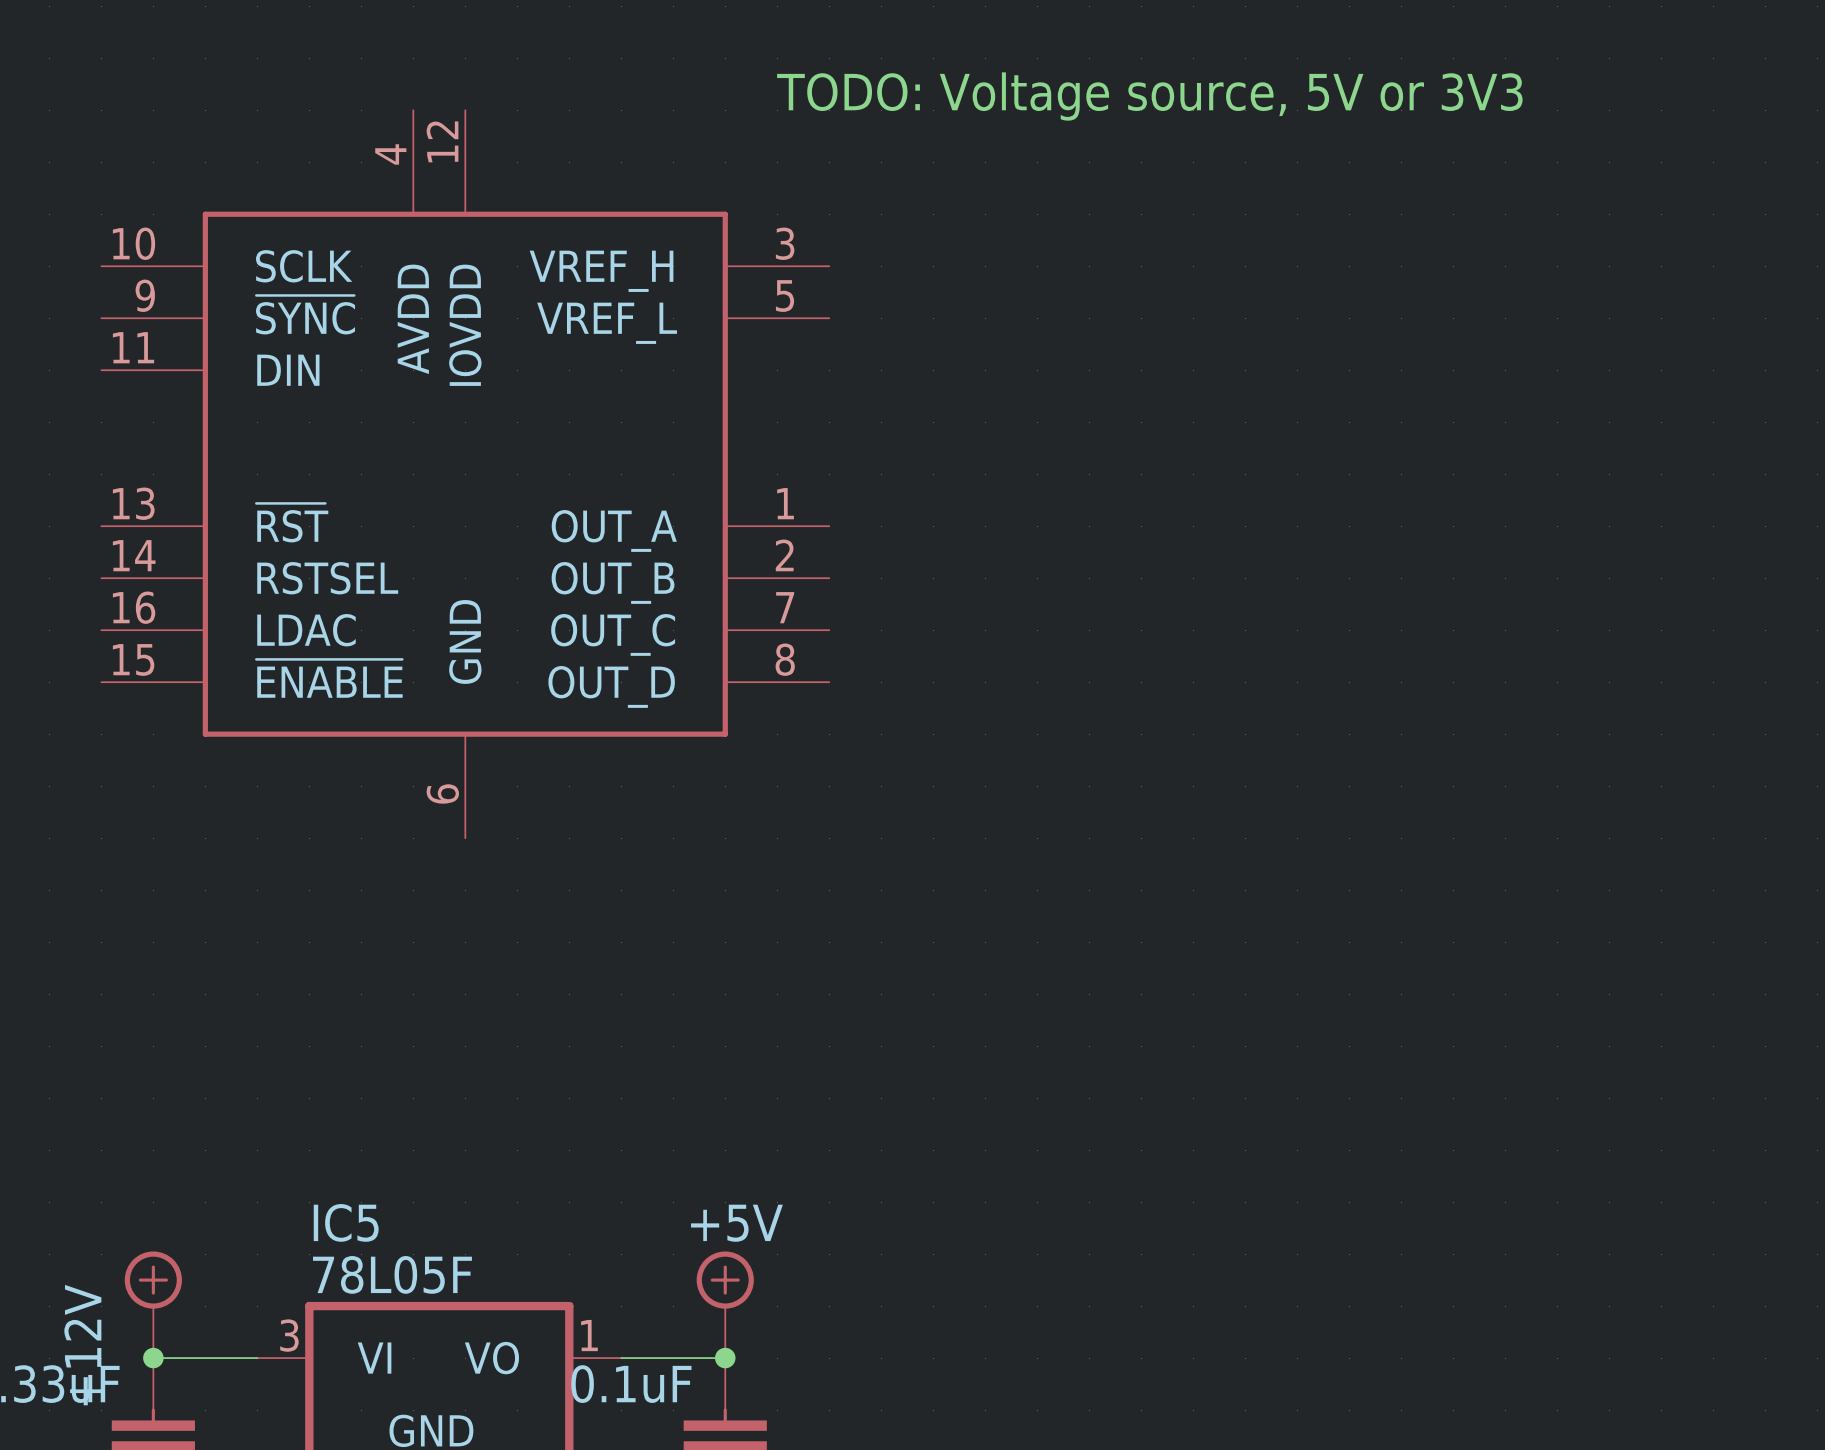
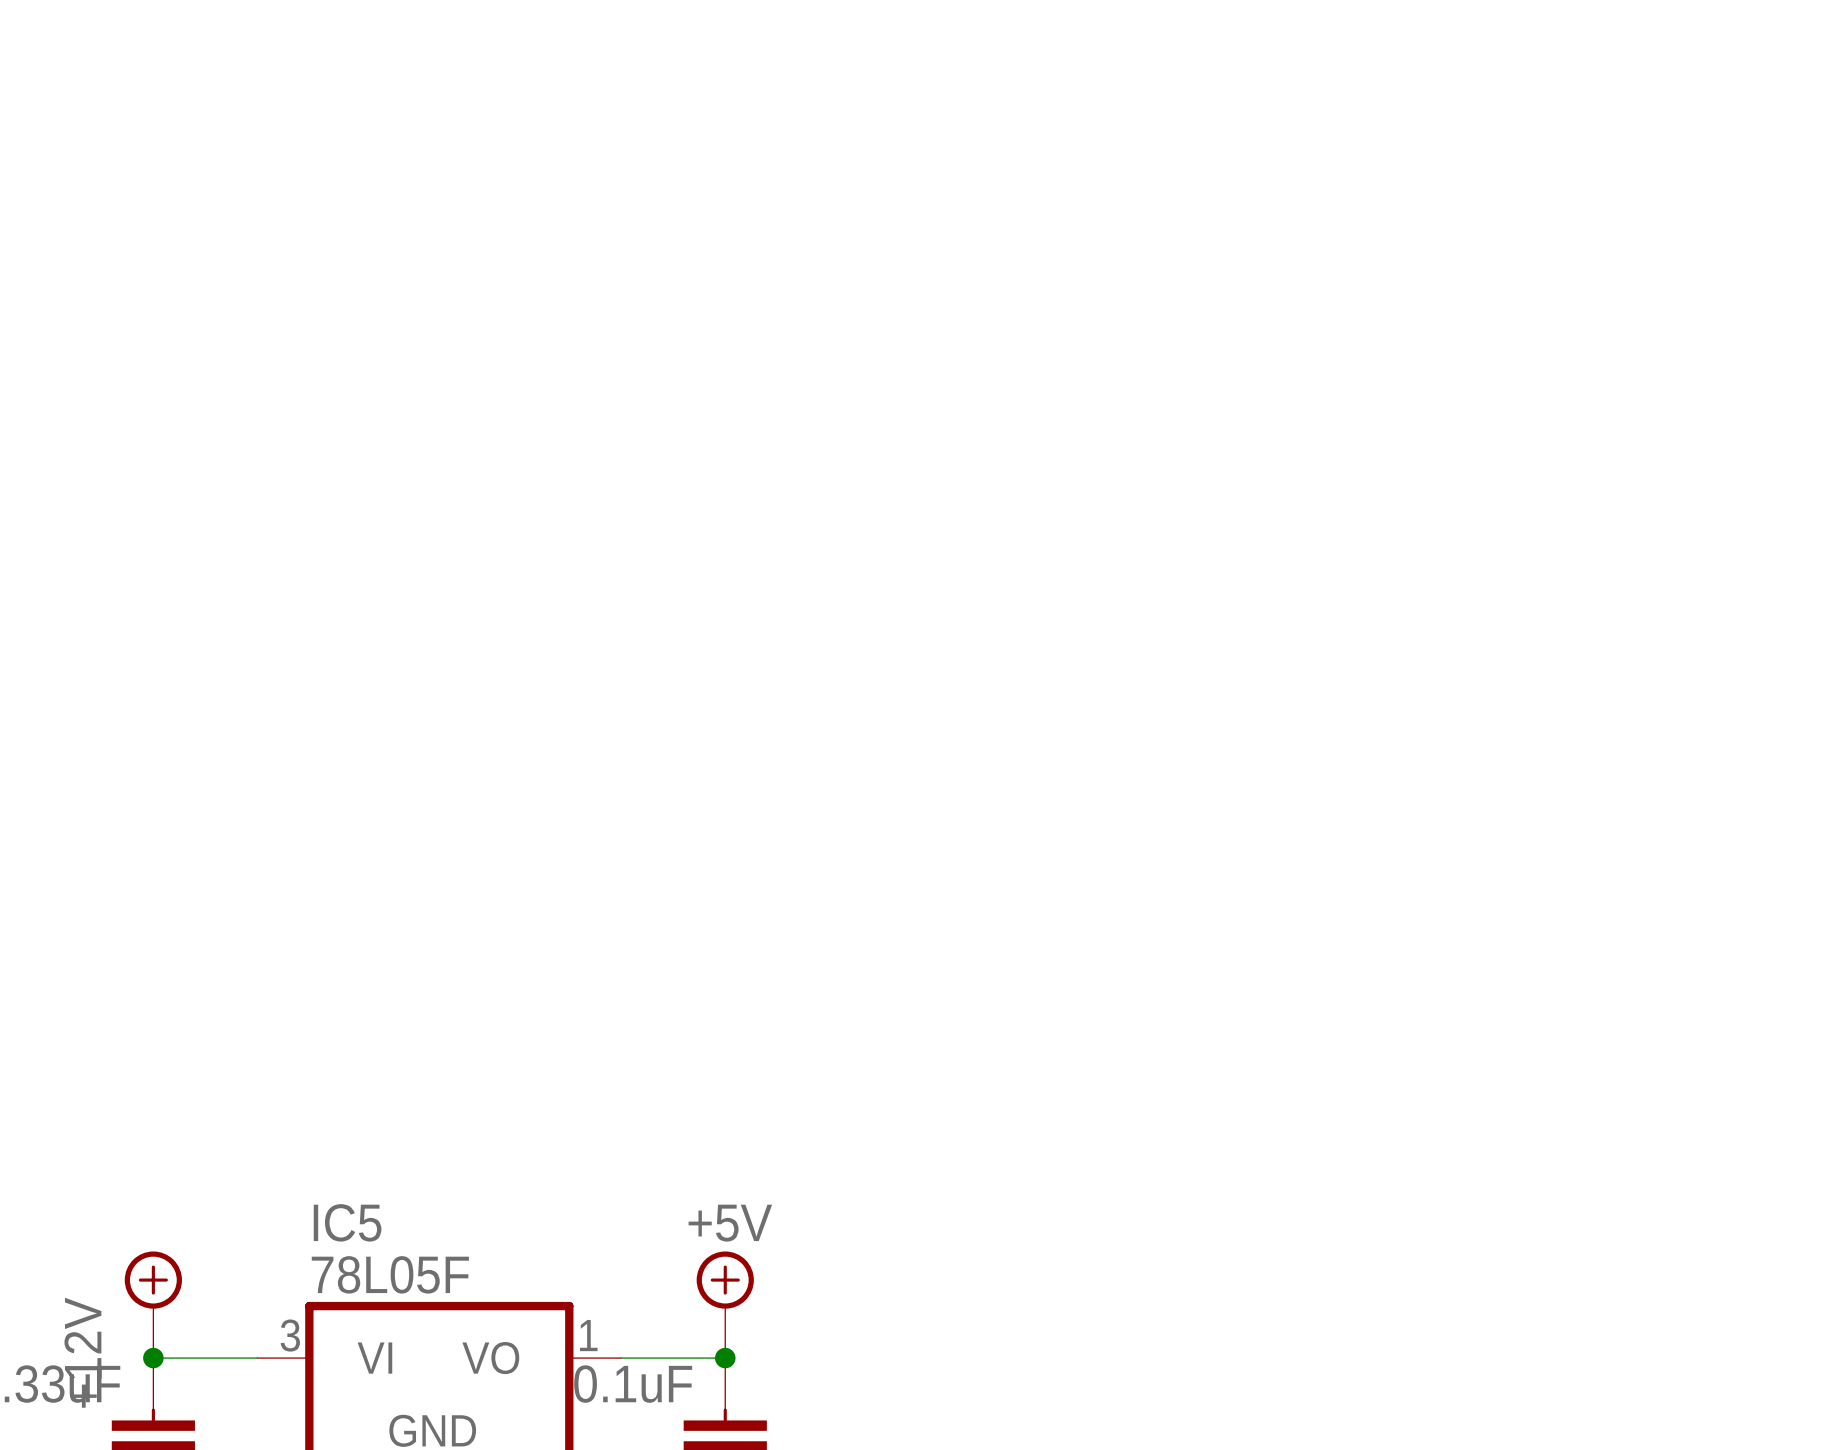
text: TODO: Voltage source, 5V or 3V3 (1149, 96) -> none
part: (465, 474) -> none

